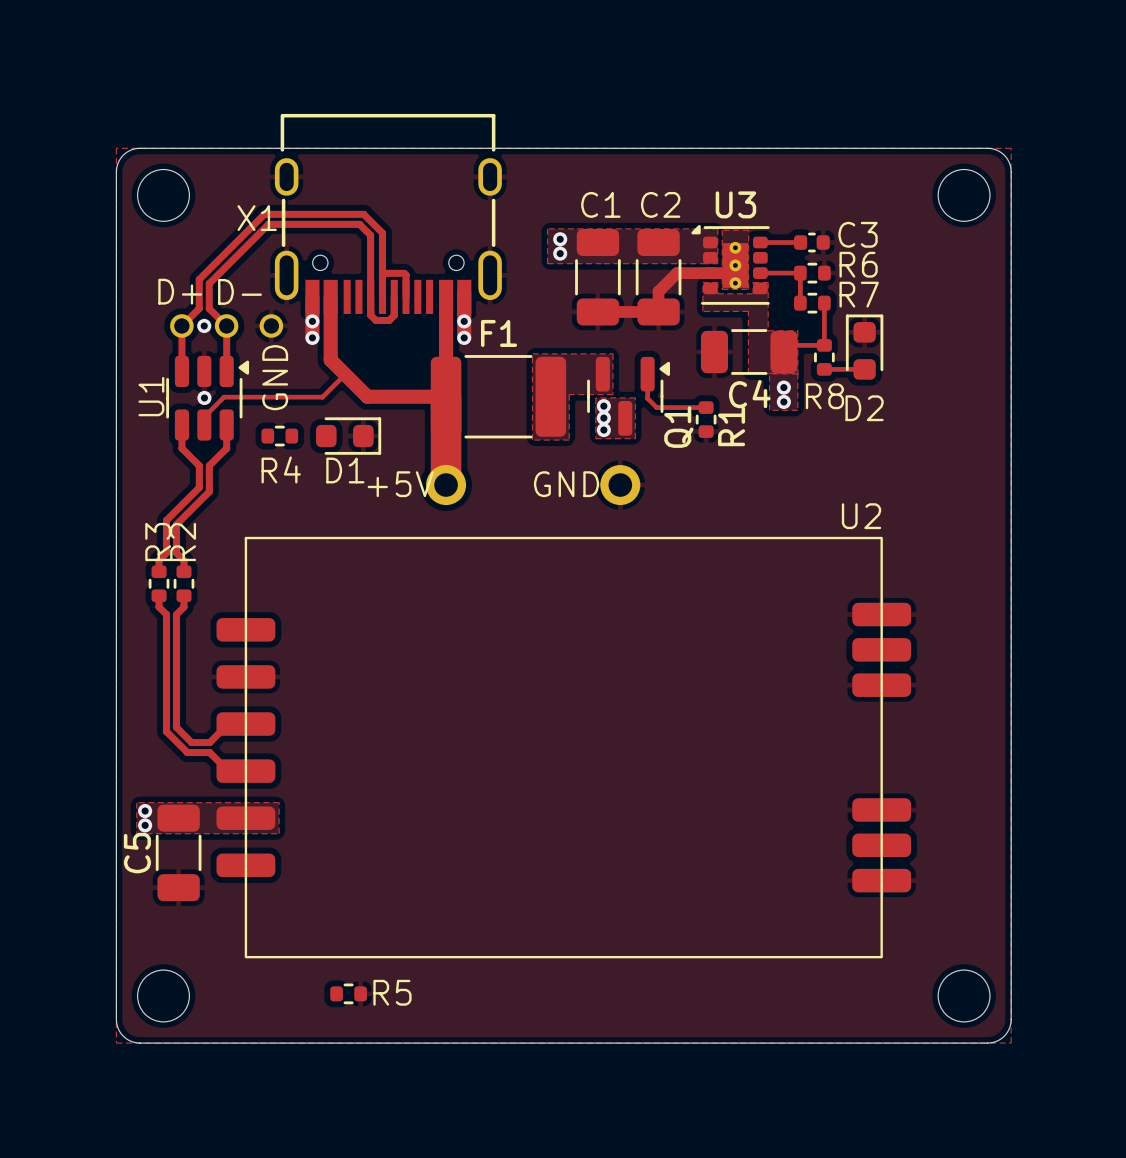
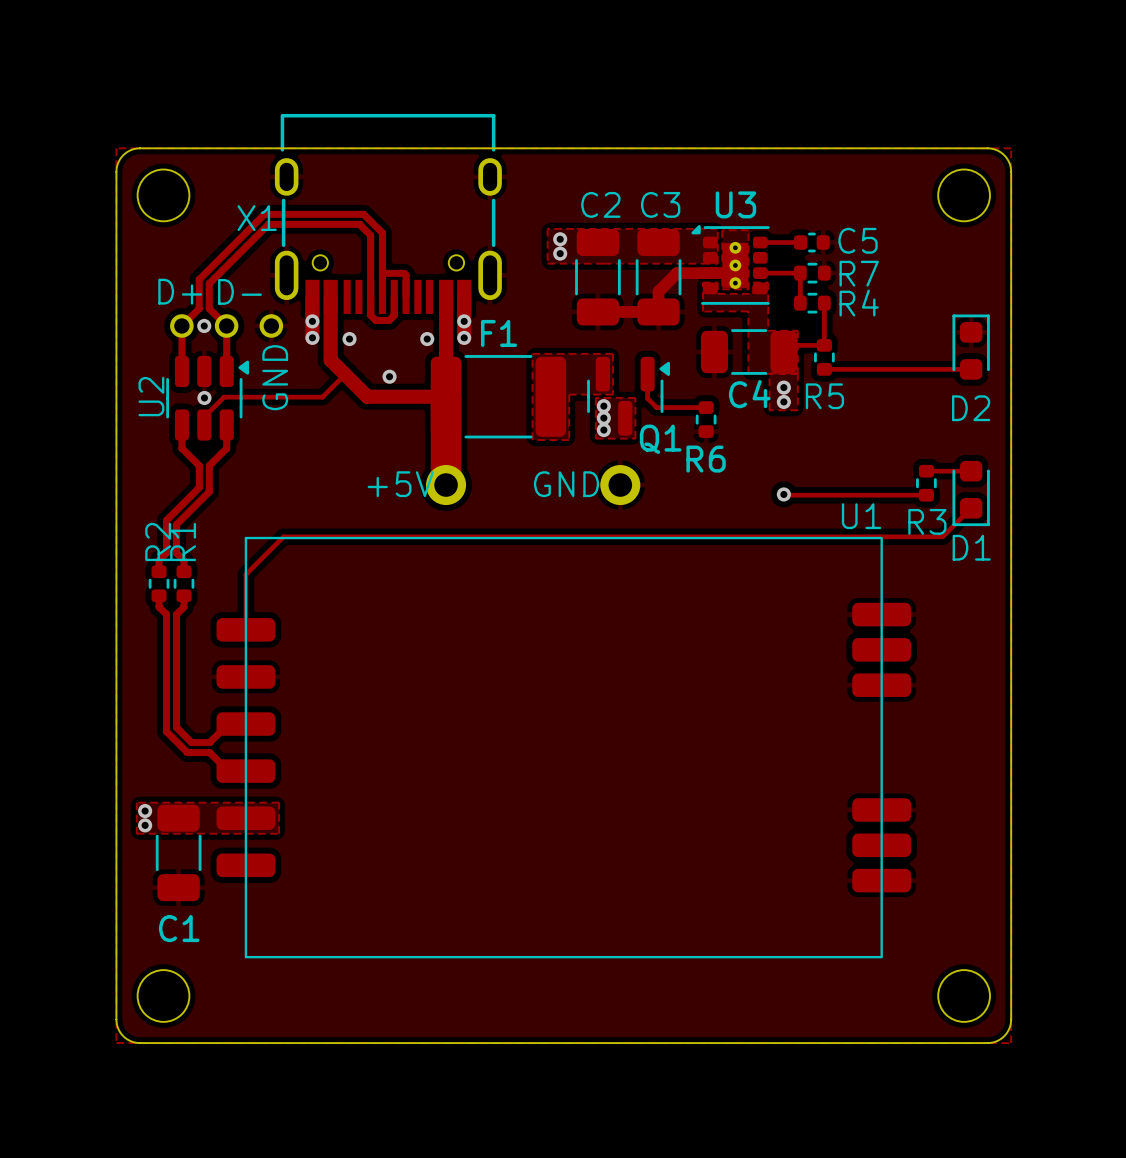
C1 name: C1 (600, 204) -> C2 (600, 204)
C2 name: C2 (660, 204) -> C3 (660, 204)
C3 name: C3 (858, 234) -> C5 (858, 240)
R6 name: R6 (858, 264) -> R7 (859, 273)
R7 name: R7 (859, 294) -> R4 (859, 303)
via: none -> (349, 339)
via: none -> (427, 339)
D2 position: (864, 347) -> (971, 347)
track: none -> (864, 369) (971, 369)
via: none -> (389, 376)
U1 name: U1 (151, 396) -> U2 (151, 396)
R8 name: R8 (824, 396) -> R5 (824, 396)
R1 name: R1 (731, 426) -> R6 (706, 459)
Q1 name rotation: 0° (678, 427) -> 90° clockwise (660, 439)
R4: (279, 436) -> none
D1 rotation: 0° (348, 436) -> 90° clockwise (971, 493)
D1 position: (348, 436) -> (971, 493)
track: none -> (926, 471) (971, 471)
R3: none -> (926, 483)
track: none -> (783, 494) (926, 495)
via: none -> (783, 494)
track: none -> (971, 508) (942, 536) (283, 536) (245, 574) (245, 629)
U2 name: U2 (861, 516) -> U1 (861, 516)
R3 name: R3 (158, 541) -> R2 (158, 541)
R2 name: R2 (183, 541) -> R1 (183, 541)
C5 name: C5 (137, 853) -> C1 (179, 928)
R5: (348, 993) -> none

